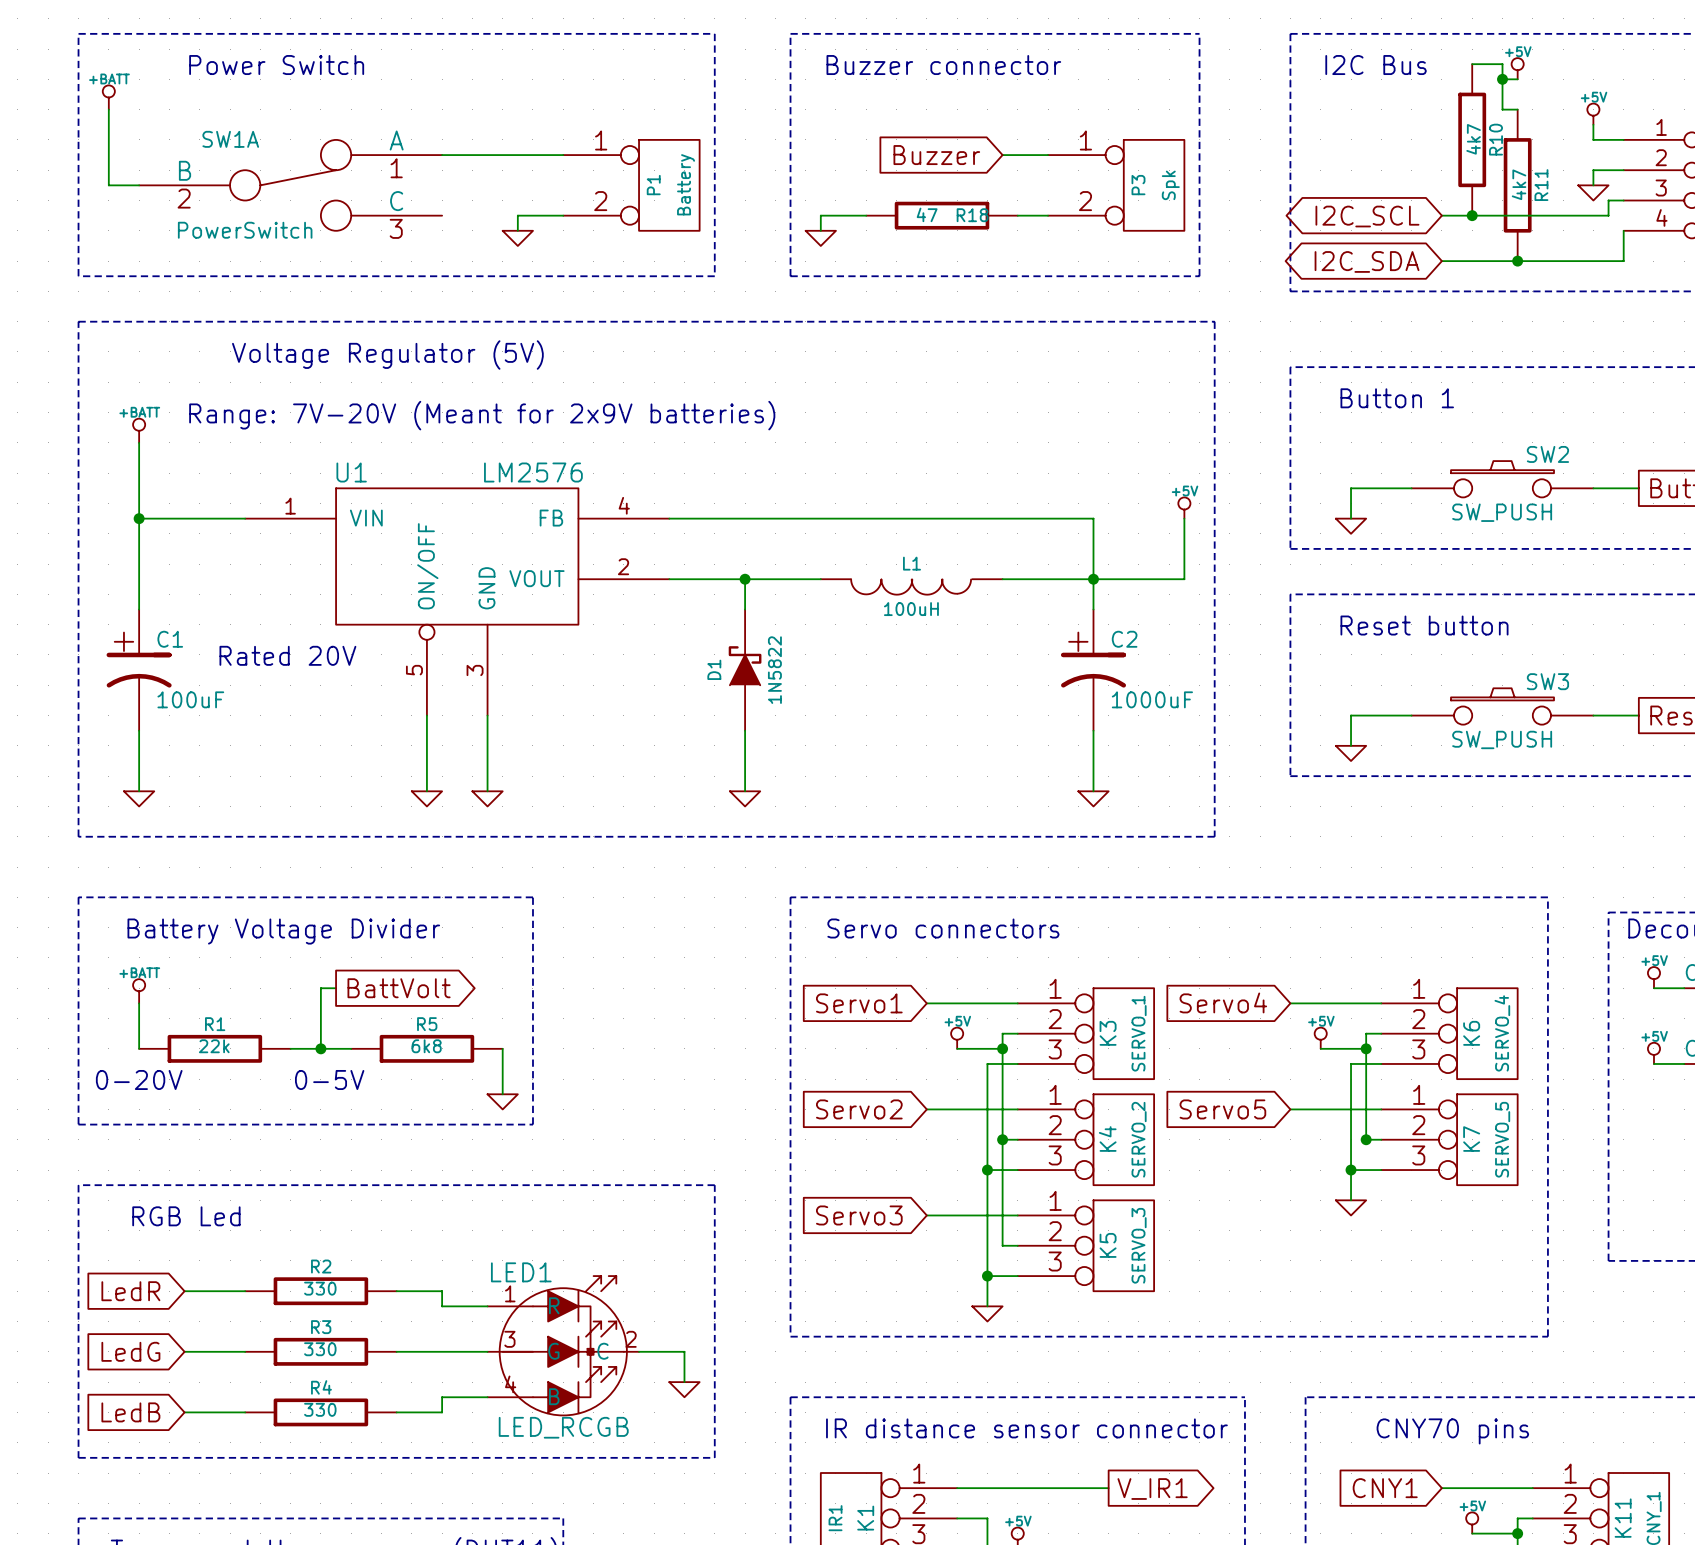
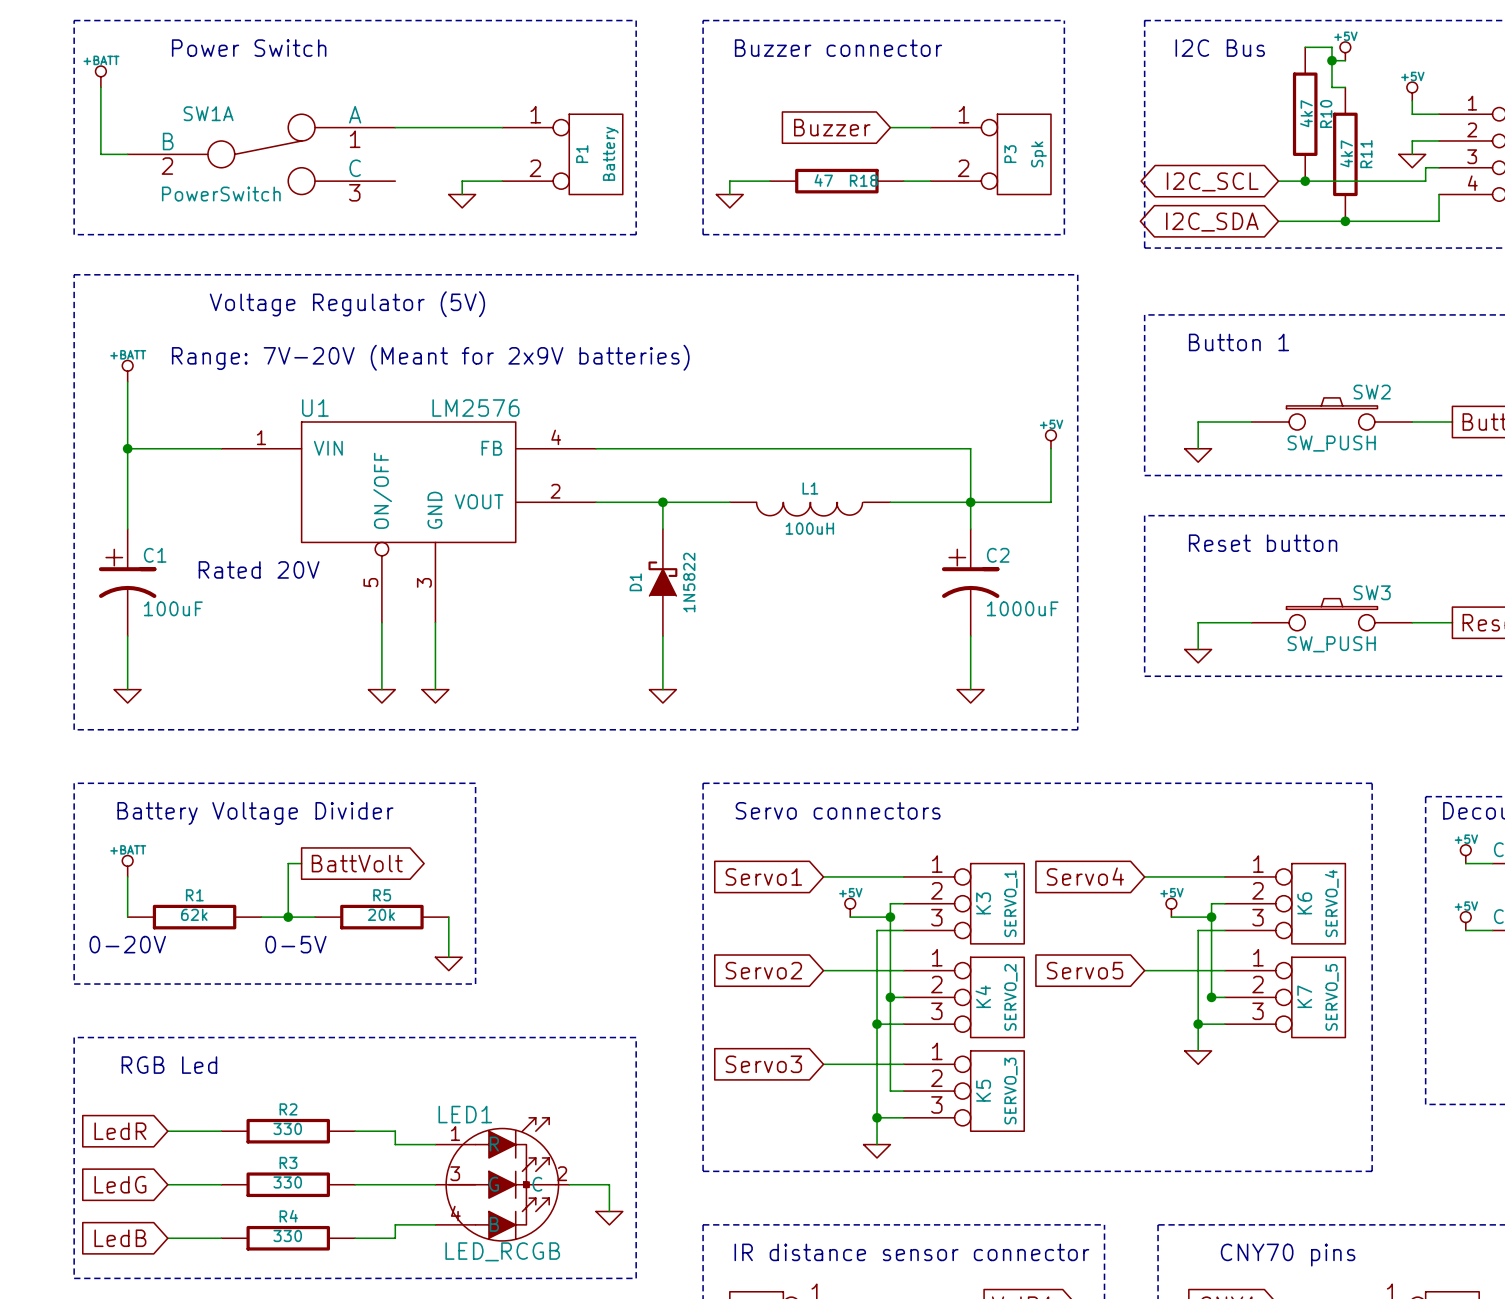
R1 value: 22k (214, 1046) -> 62k (194, 914)
R5 value: 6k8 (426, 1046) -> 20k (381, 914)

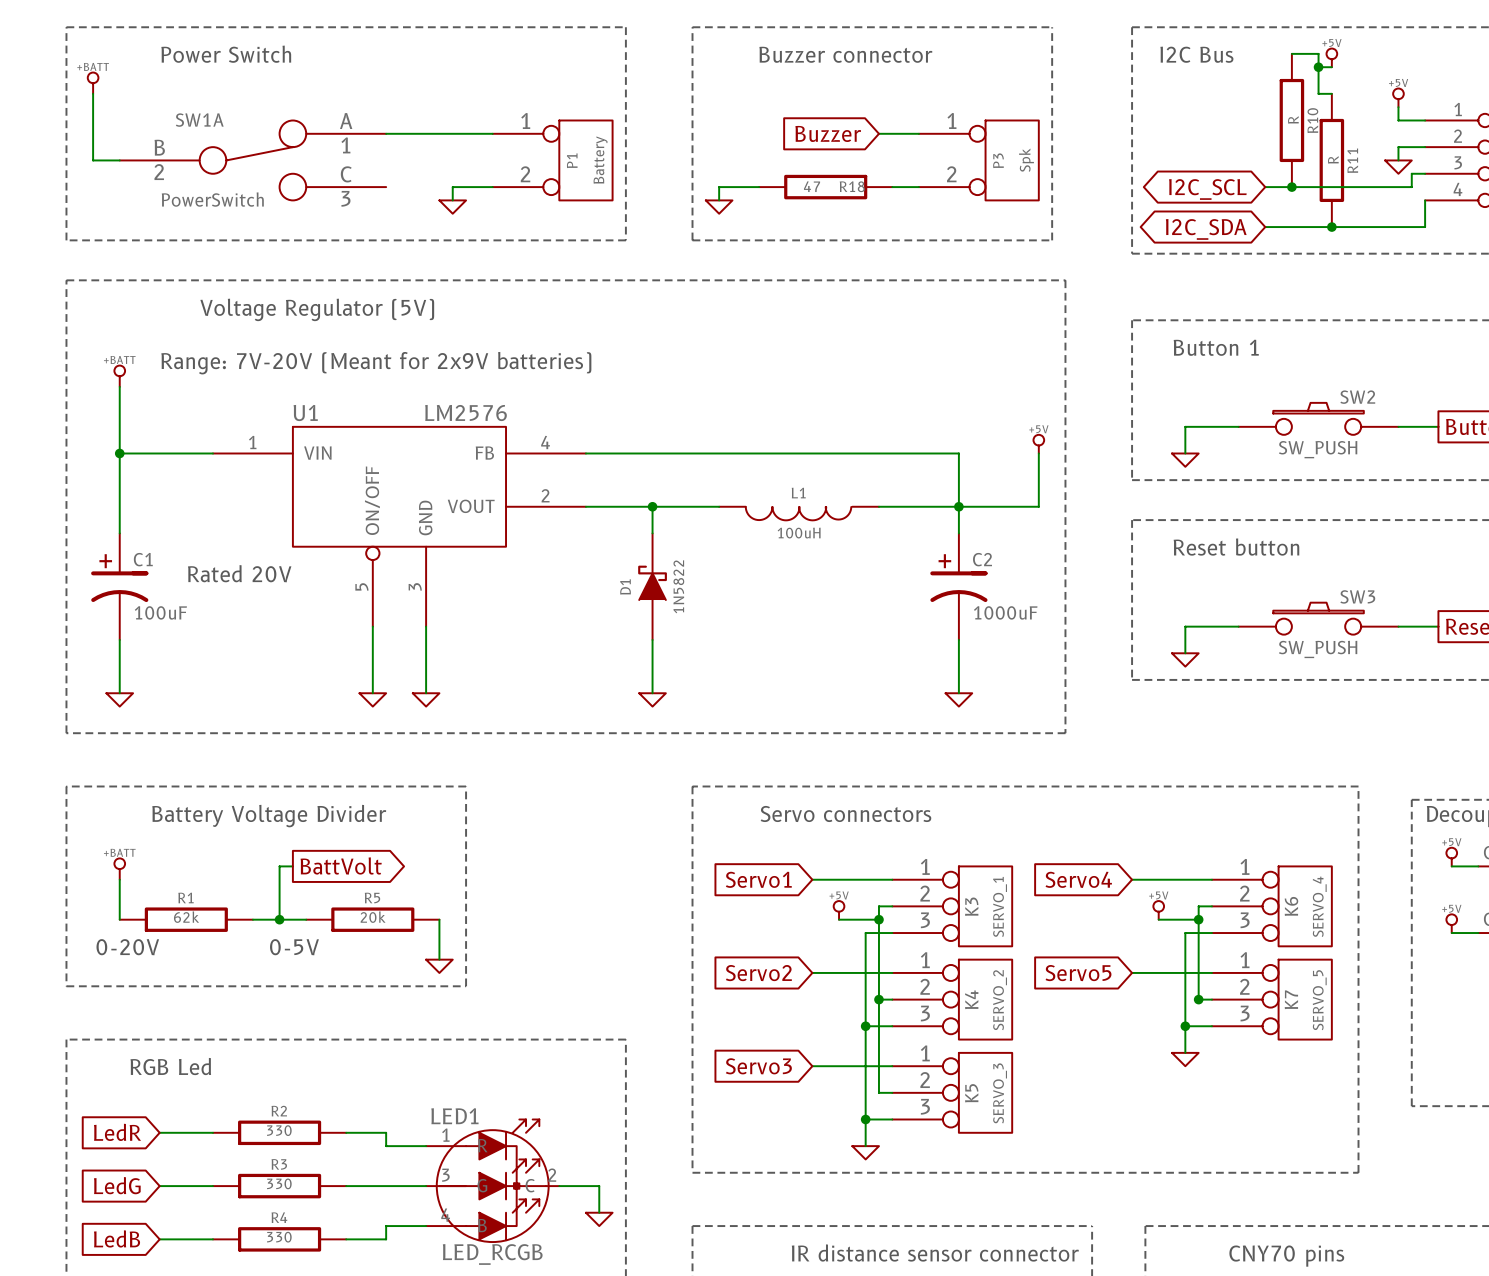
R10 value: 4k7 (1306, 113) -> R (1293, 119)
R11 value: 4k7 (1346, 153) -> R (1333, 159)

